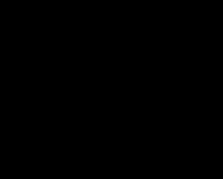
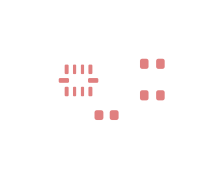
part: none -> (152, 63)
part: none -> (78, 80)
part: none -> (152, 95)
part: none -> (106, 115)

